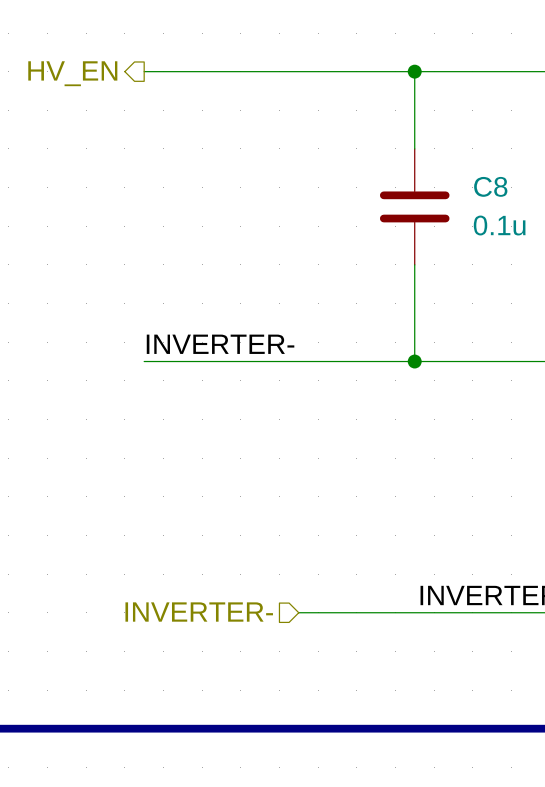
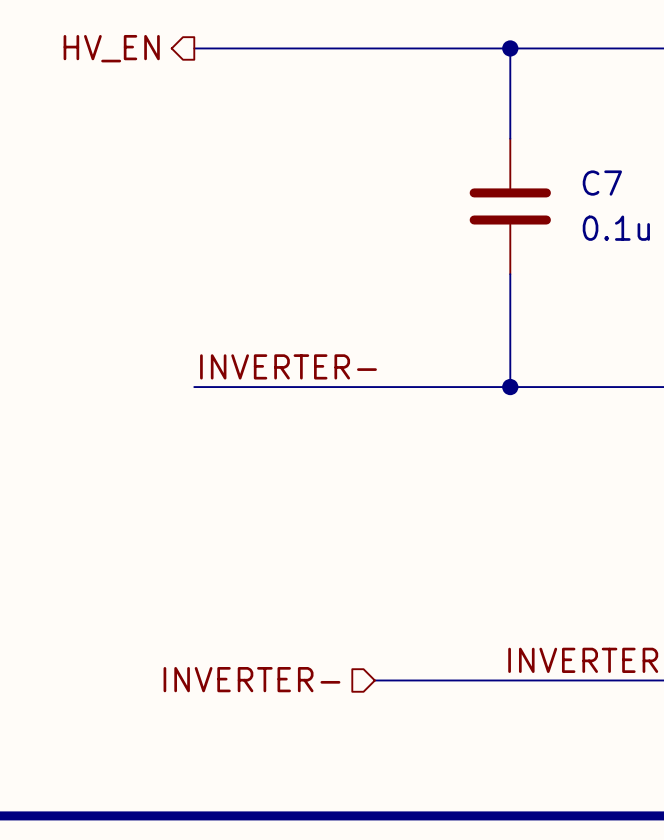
C8 name: C8 (490, 186) -> C7 (602, 183)

